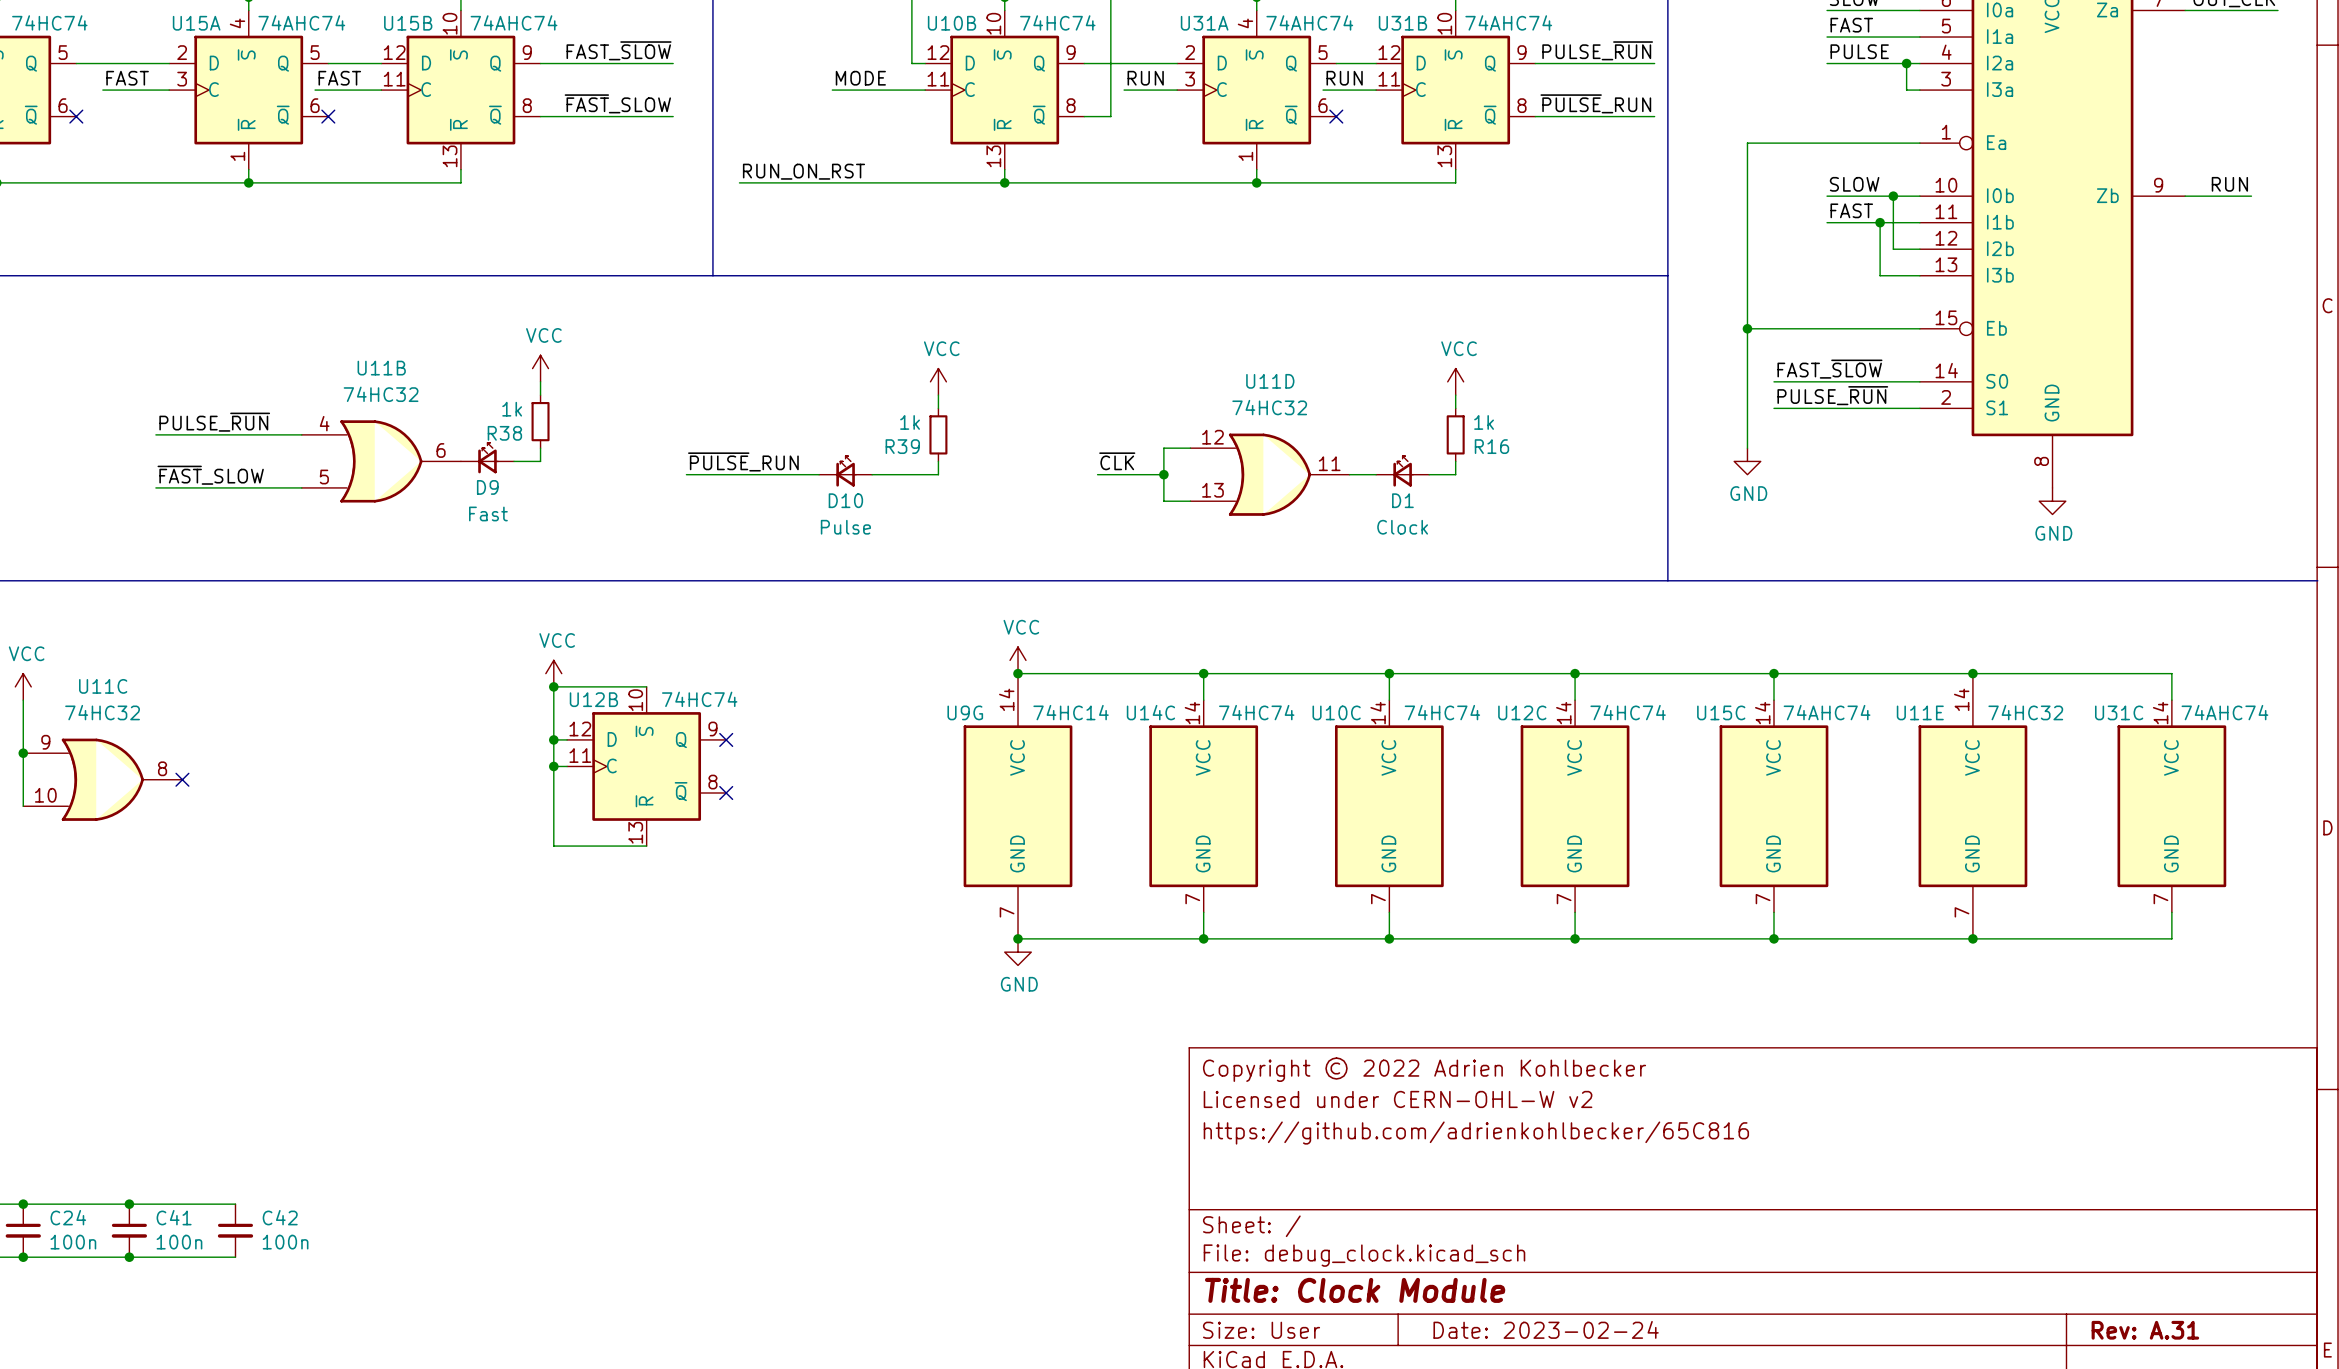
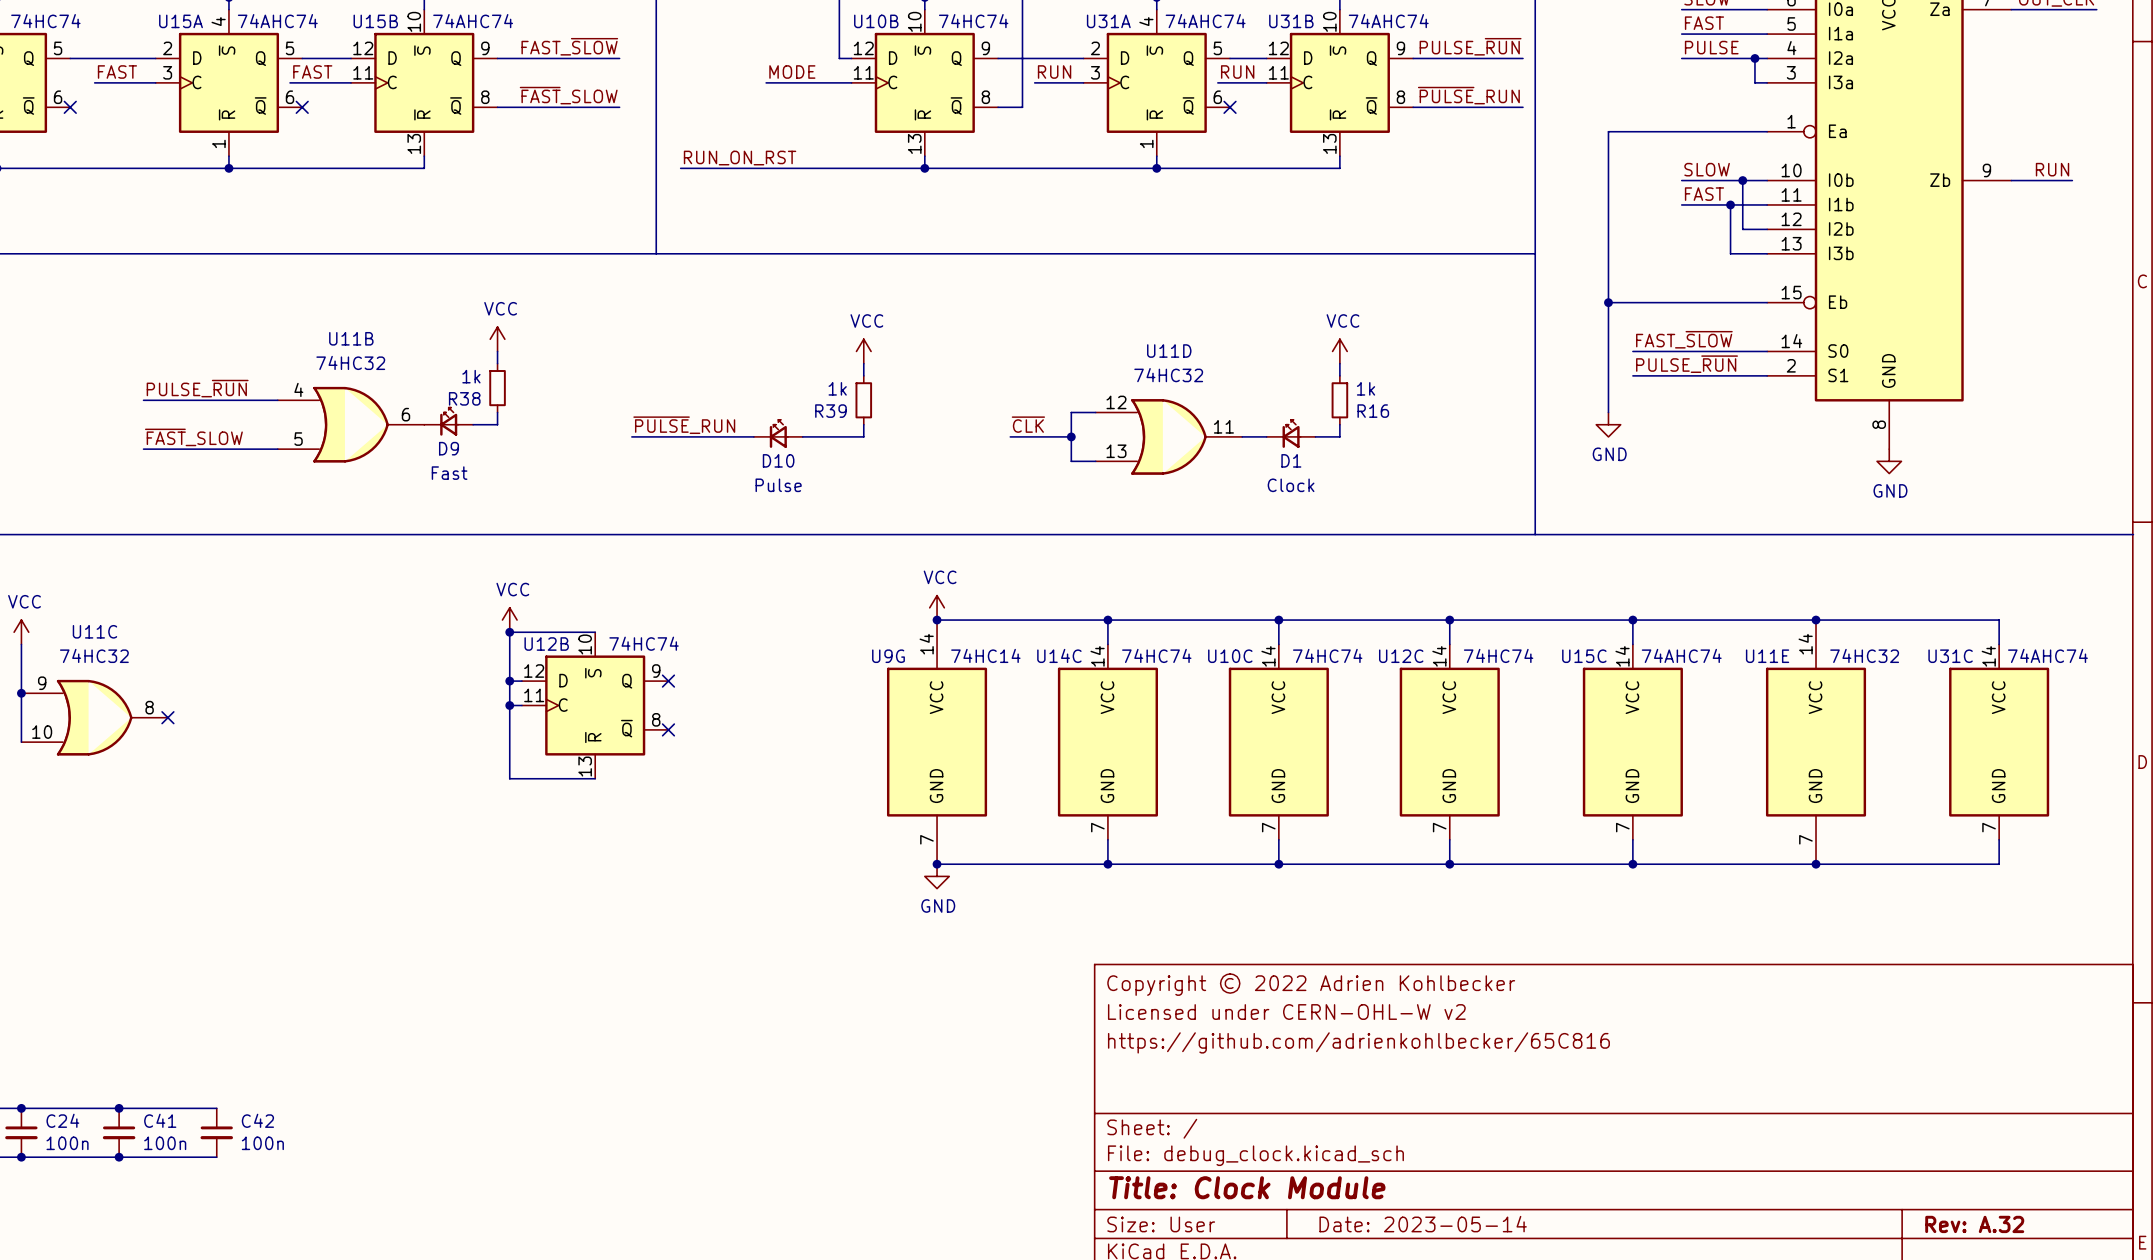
title block: Date: 2023-02-24 (1546, 1329) -> Date: 2023-05-14 (1423, 1224)
title block: Rev: A.31 (2145, 1330) -> Rev: A.32 (1974, 1224)

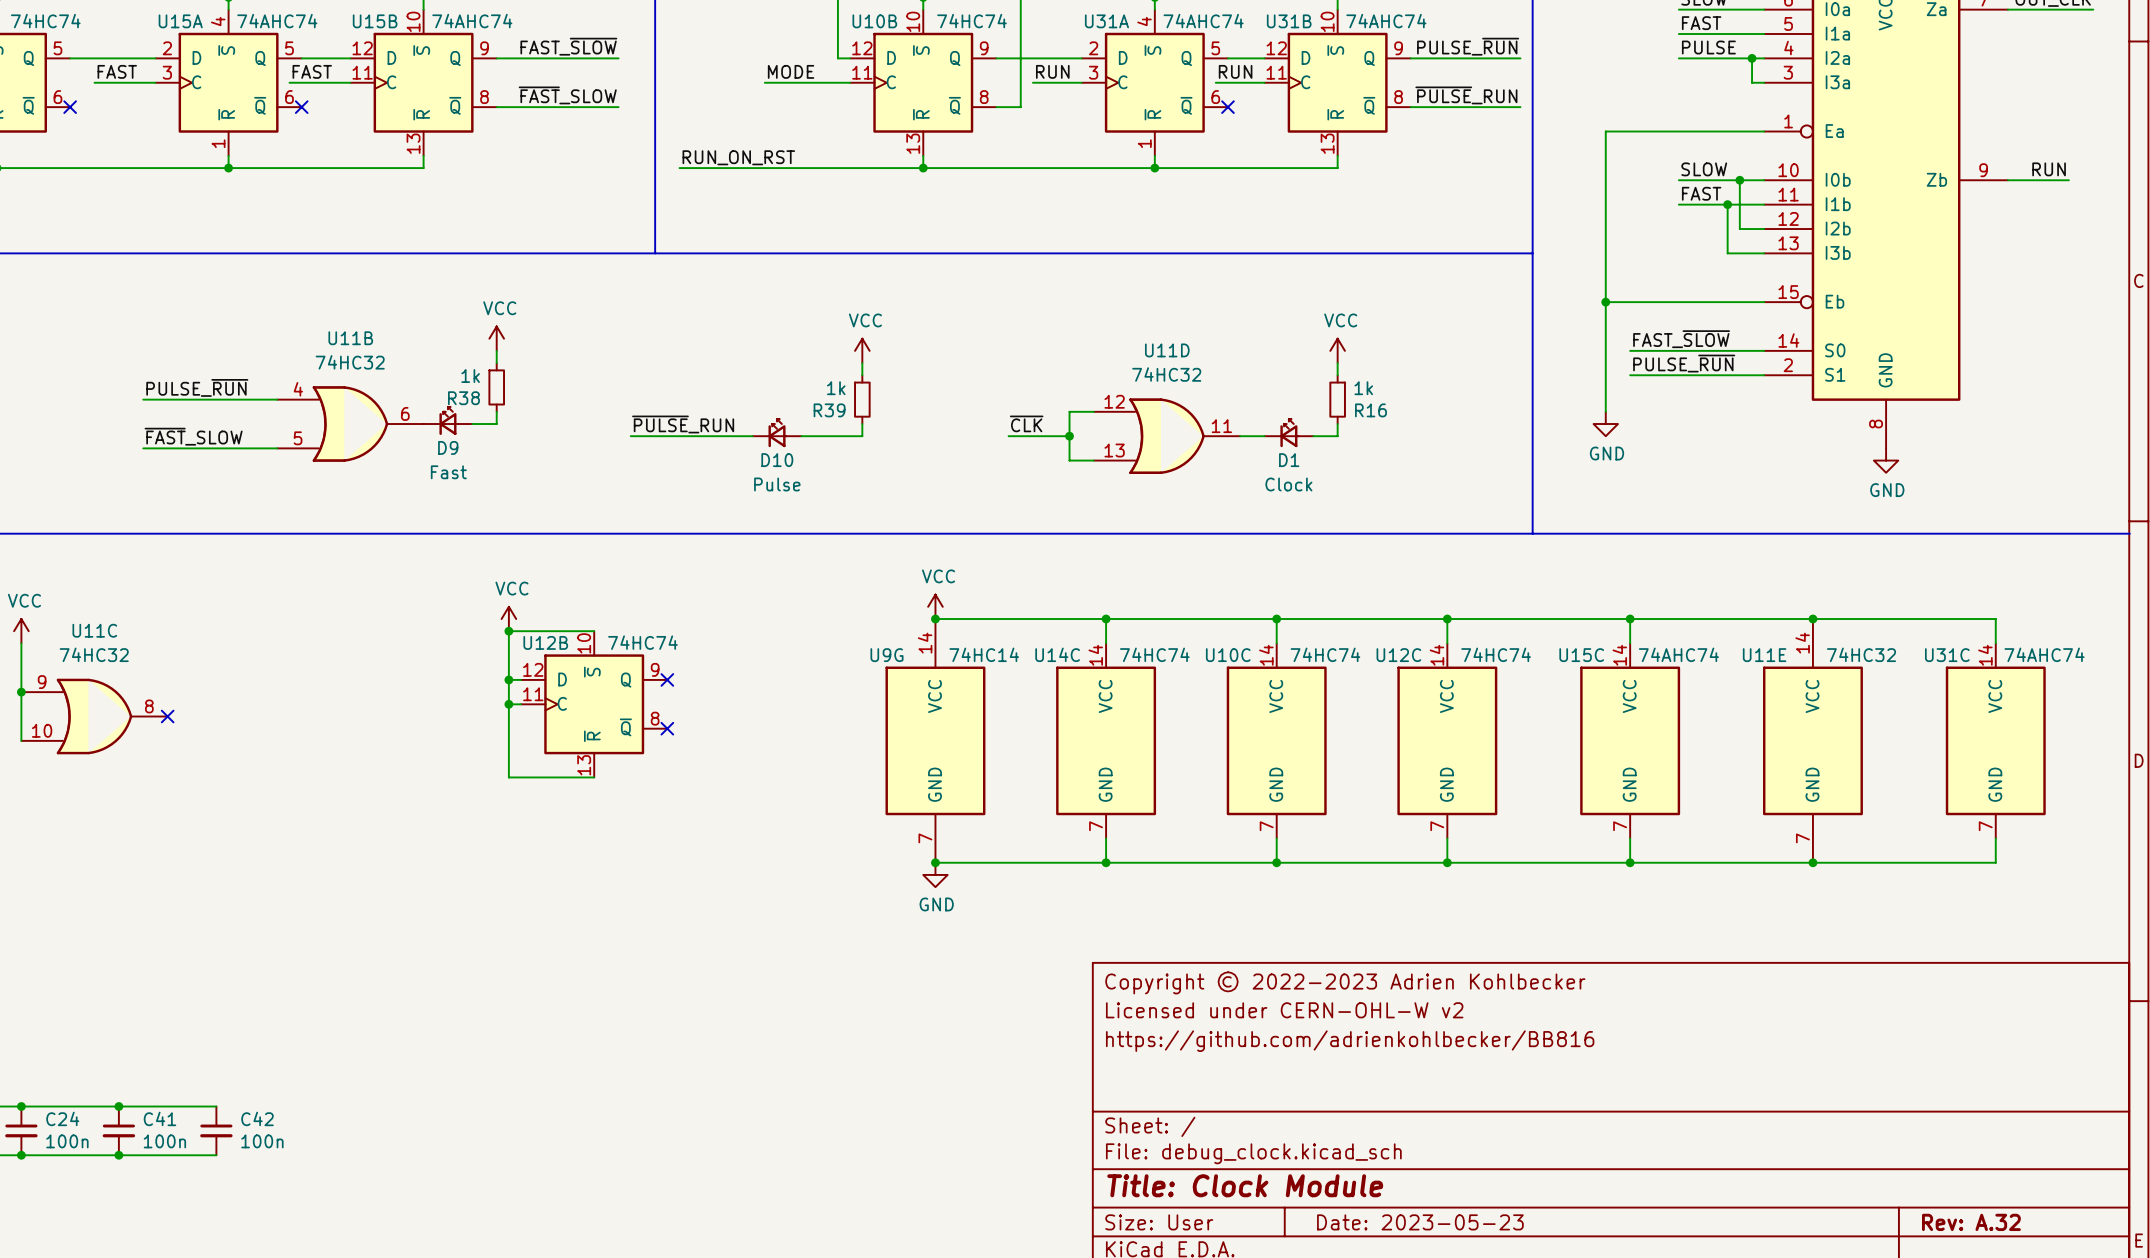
title block: Copyright © 2022 Adrien Kohlbecker (1311, 984) -> Copyright © 2022-2023 Adrien Kohlbecker (1345, 982)
title block: https://github.com/adrienkohlbecker/65C816 (1358, 1042) -> https://github.com/adrienkohlbecker/BB816 (1350, 1041)
title block: Date: 2023-05-14 (1423, 1224) -> Date: 2023-05-23 (1420, 1222)

